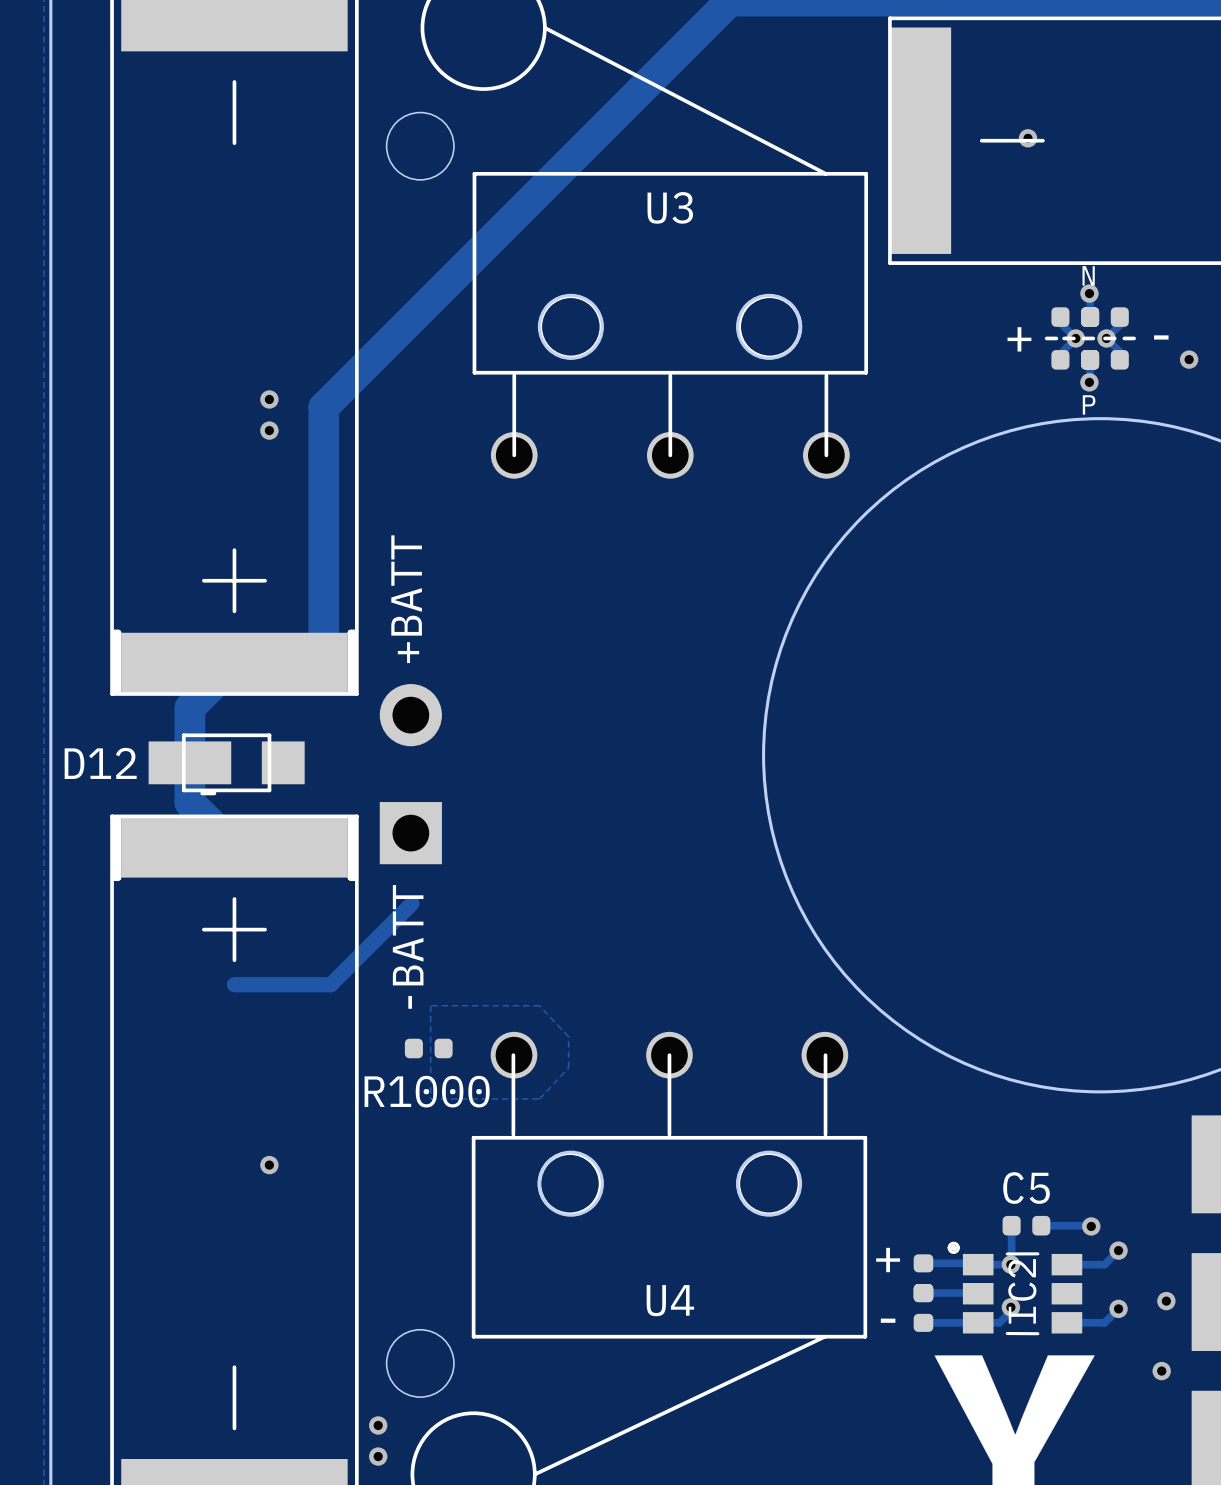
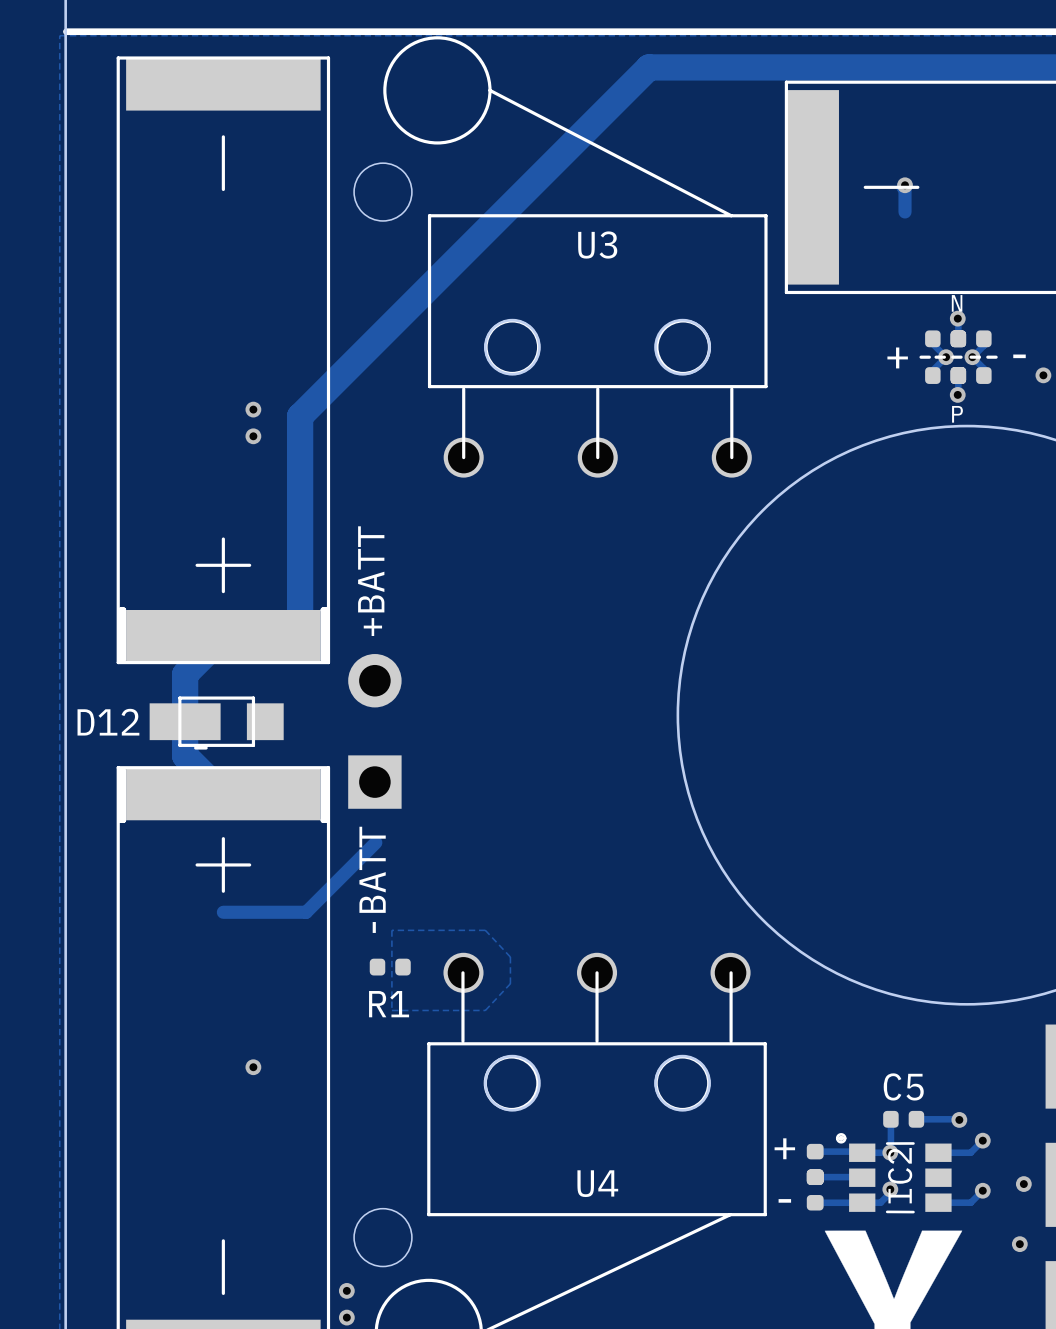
track: none -> (902, 187) (905, 185) (905, 211)
R1000 name: R1000 (427, 1091) -> R1 (389, 1004)

